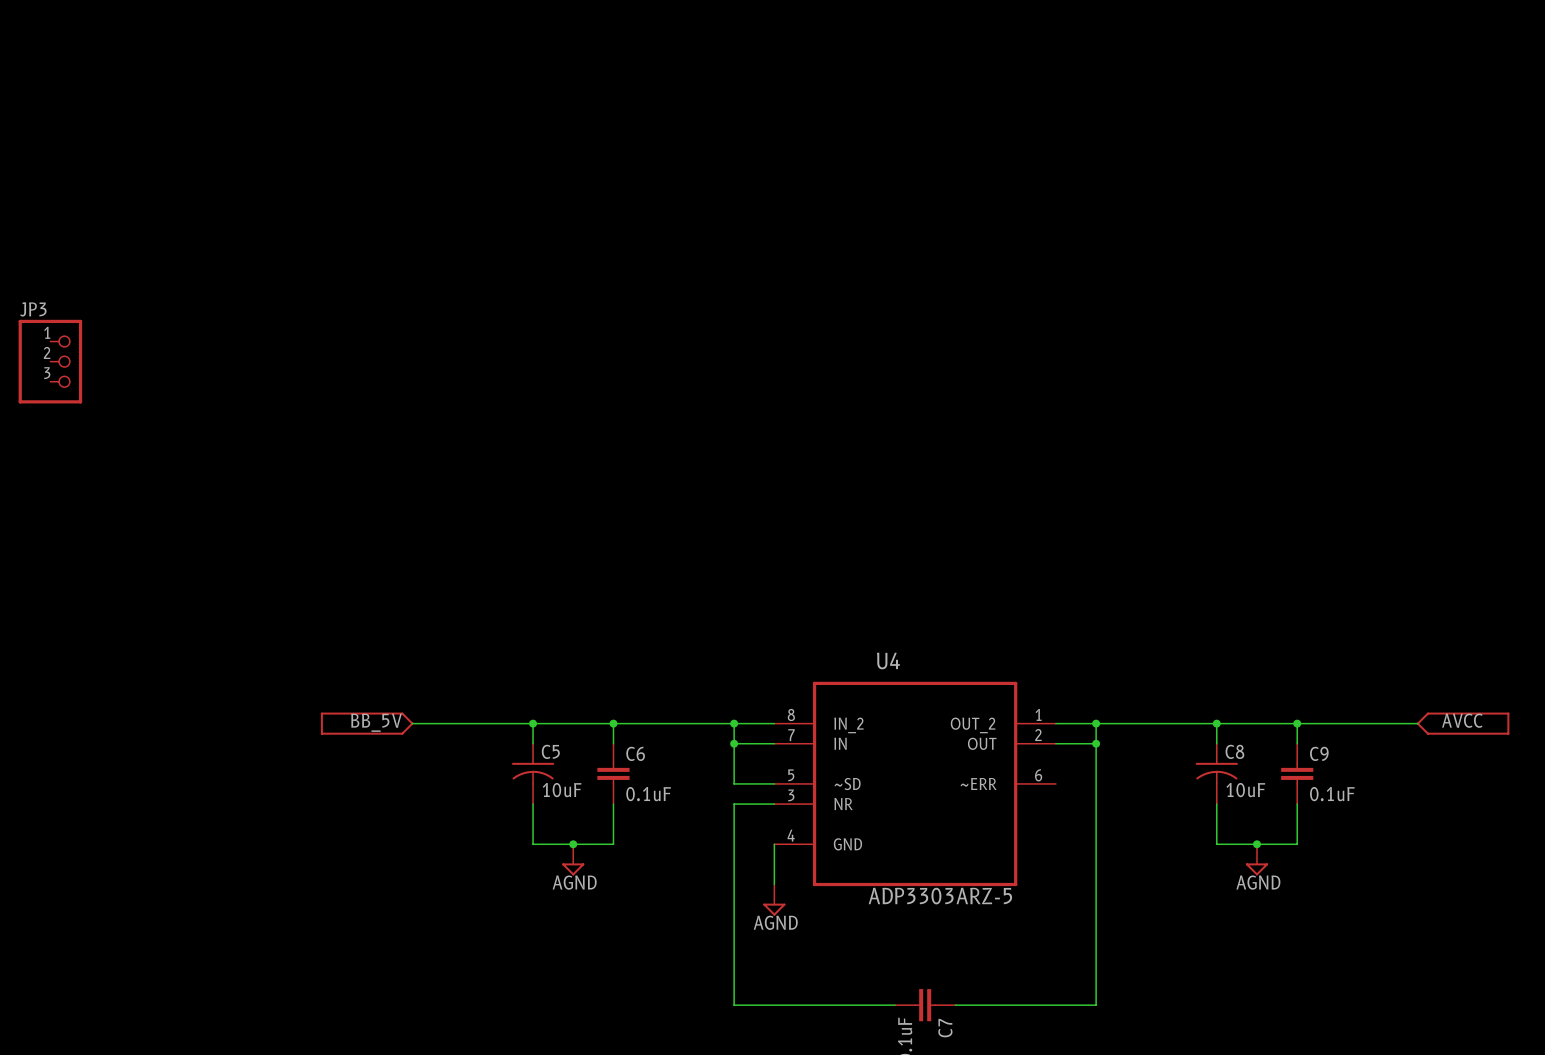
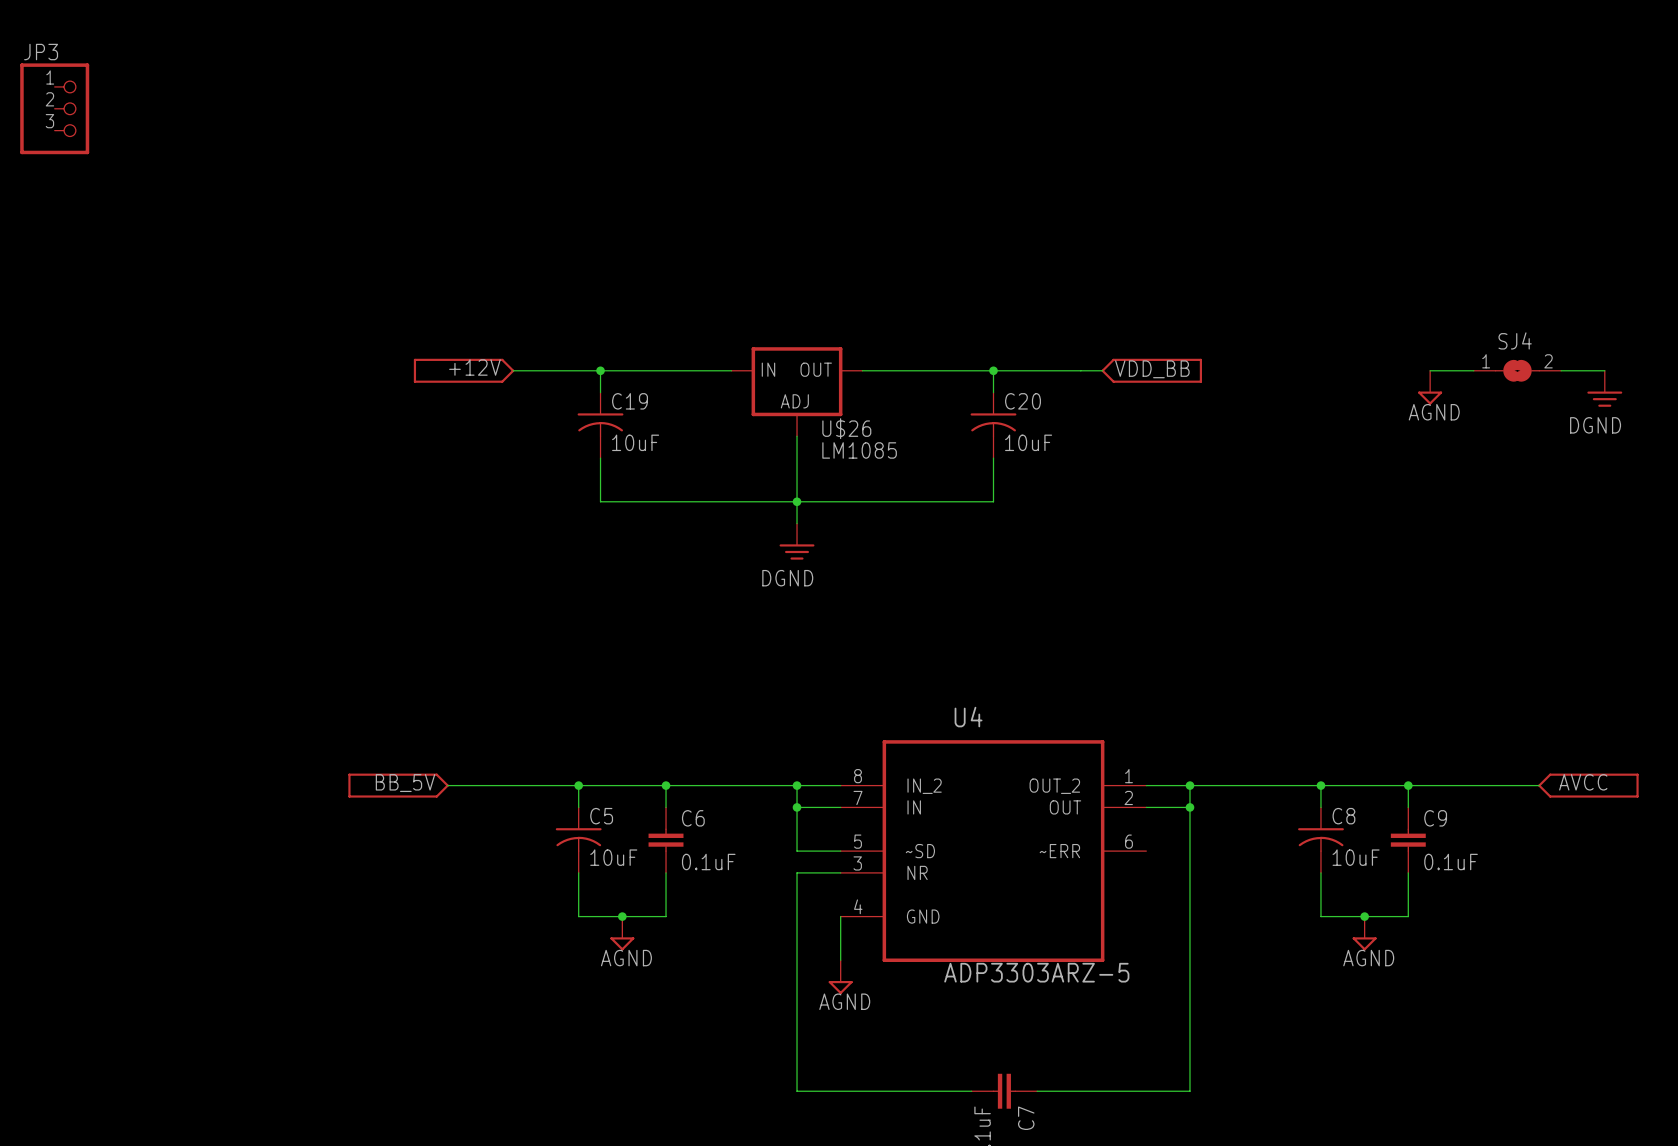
label: none -> +12V (474, 367)
part: none -> (464, 370)
wire: none -> (513, 370) (731, 370)
wire: none -> (600, 370) (600, 392)
junction: none -> (600, 370)
wire: none -> (862, 370) (1102, 370)
wire: none -> (993, 370) (993, 392)
junction: none -> (993, 370)
label: none -> VDD_BB (1152, 369)
part: none -> (1151, 370)
wire: none -> (1430, 370) (1473, 370)
SJ4: none -> (1517, 370)
wire: none -> (1561, 370) (1604, 370)
power symbol: none -> AGND (1430, 387)
power symbol: none -> DGND (1604, 388)
U$26: none -> LM1085 (797, 391)
JP3 position: (50, 361) -> (54, 108)
C19: none -> 10uF (600, 425)
C20: none -> 10uF (993, 425)
wire: none -> (797, 436) (797, 523)
wire: none -> (600, 458) (600, 501) (993, 501) (993, 458)
junction: none -> (797, 501)
power symbol: none -> DGND (797, 541)

